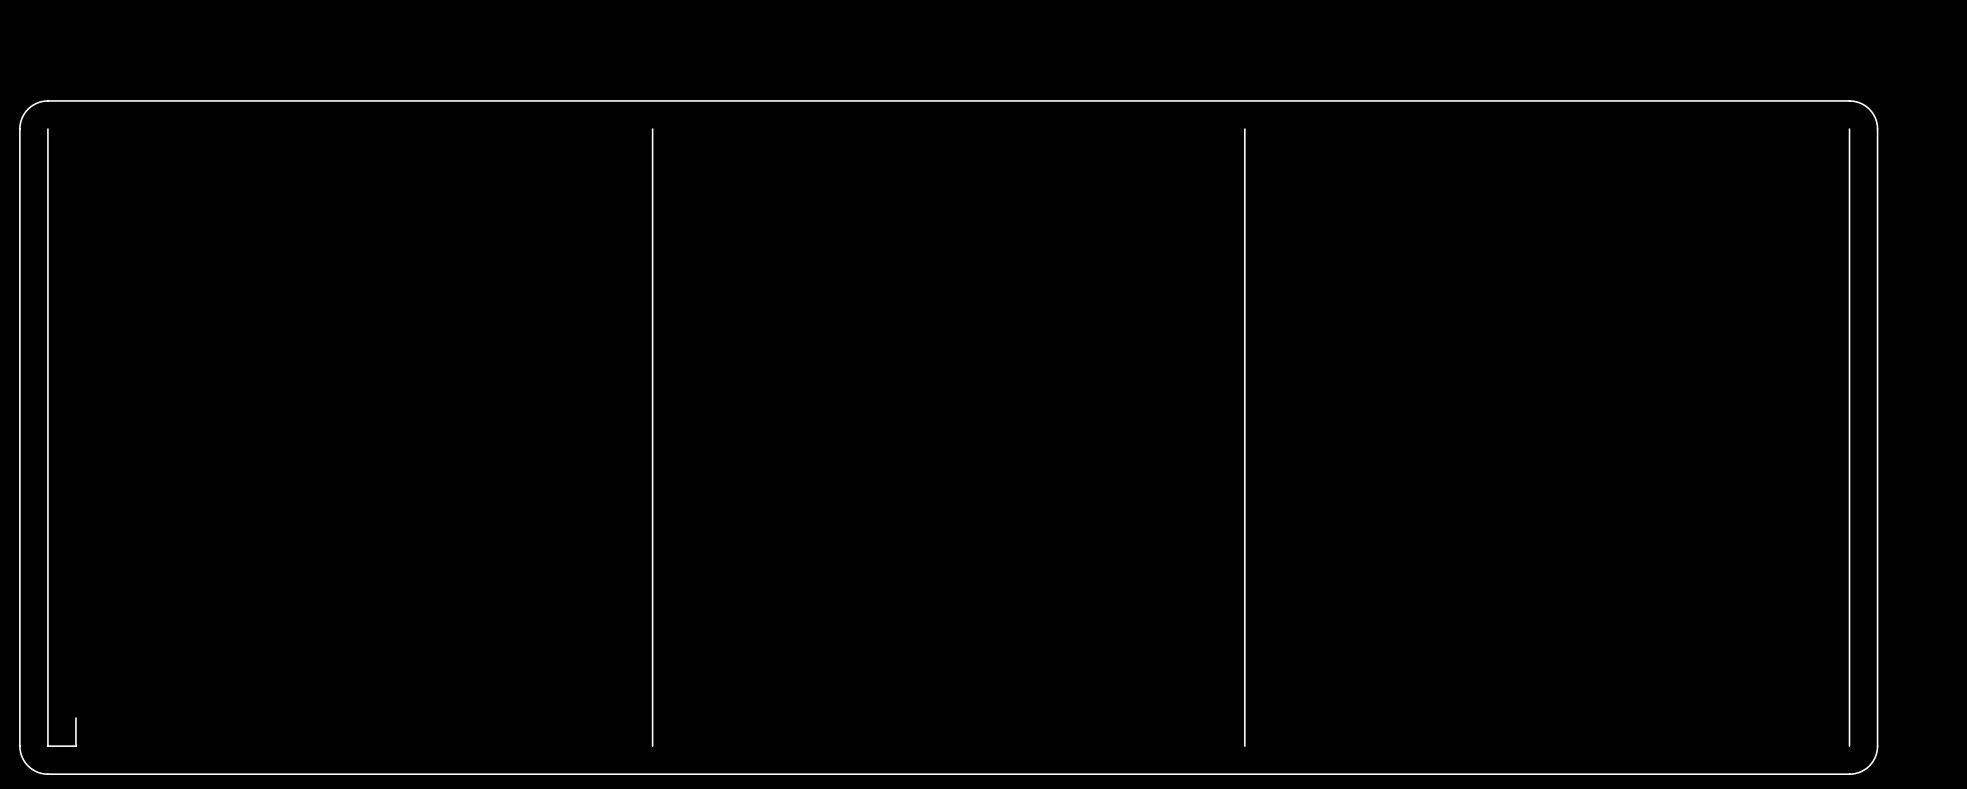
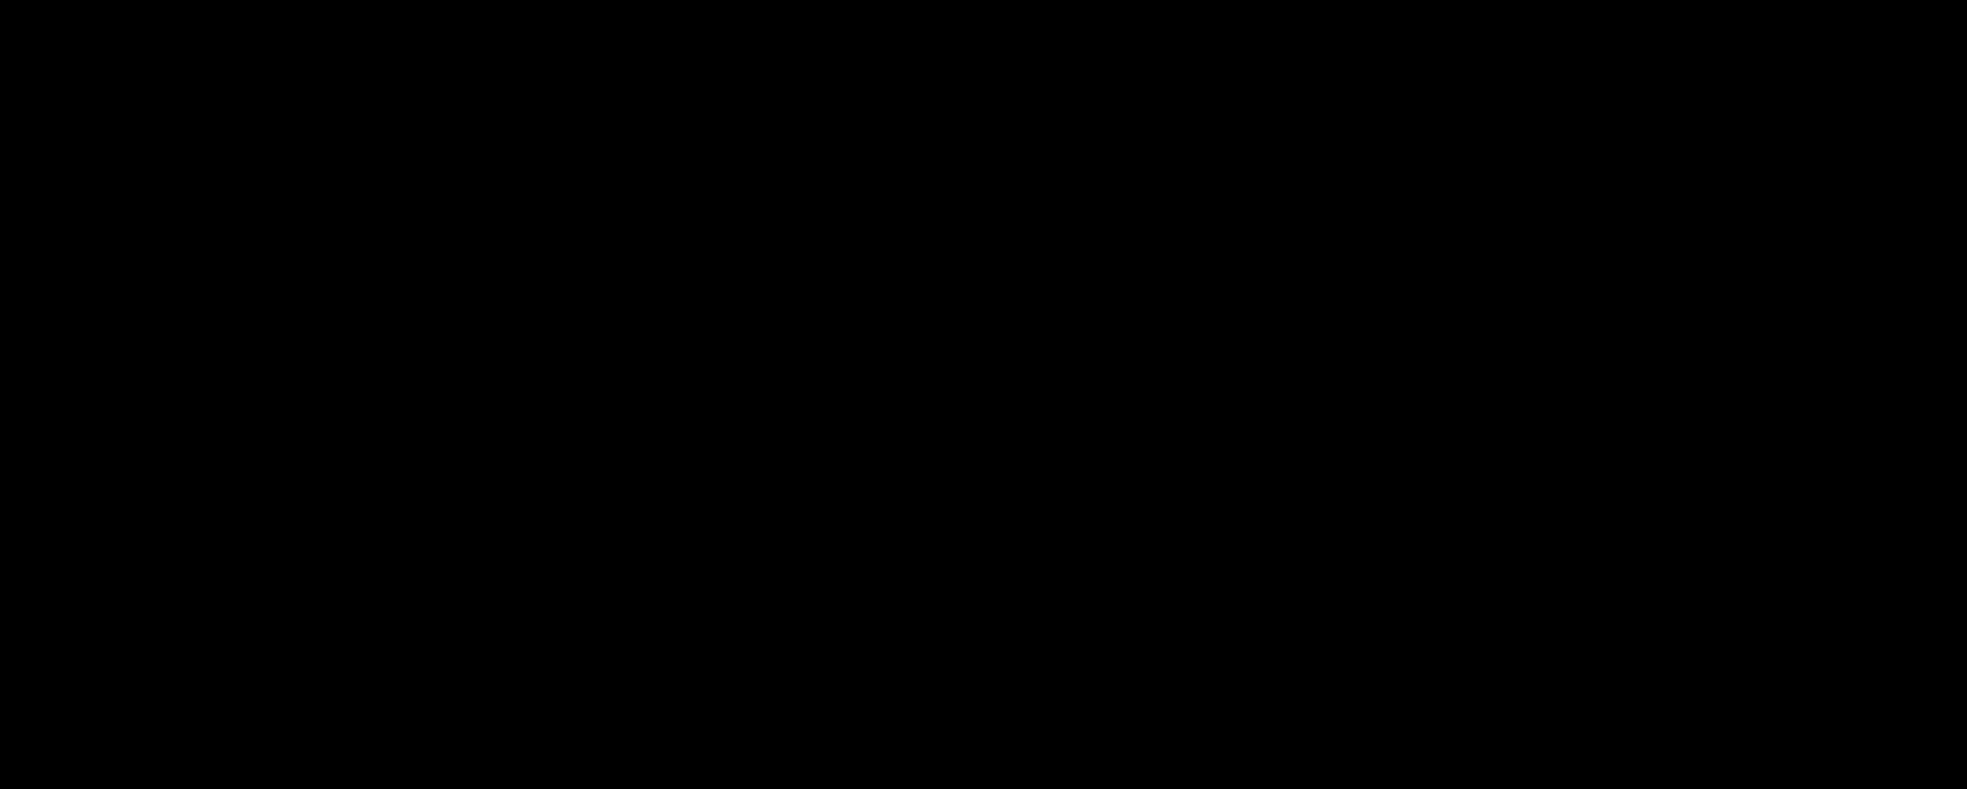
board edge: (47, 100) (1849, 100) (1858, 102) (1867, 107) (1873, 114) (1877, 129) (1877, 746) (1875, 755) (1867, 768) (1858, 772) (1849, 774) (47, 774) (38, 772) (30, 768) (24, 761) (19, 746) (19, 129) (22, 116) (28, 109) (38, 102) (47, 100) -> none
board edge: (47, 129) (47, 746) (75, 746) (75, 718) -> none
board edge: (652, 129) (652, 746) -> none
board edge: (1244, 129) (1244, 746) -> none
board edge: (1849, 129) (1849, 746) -> none

